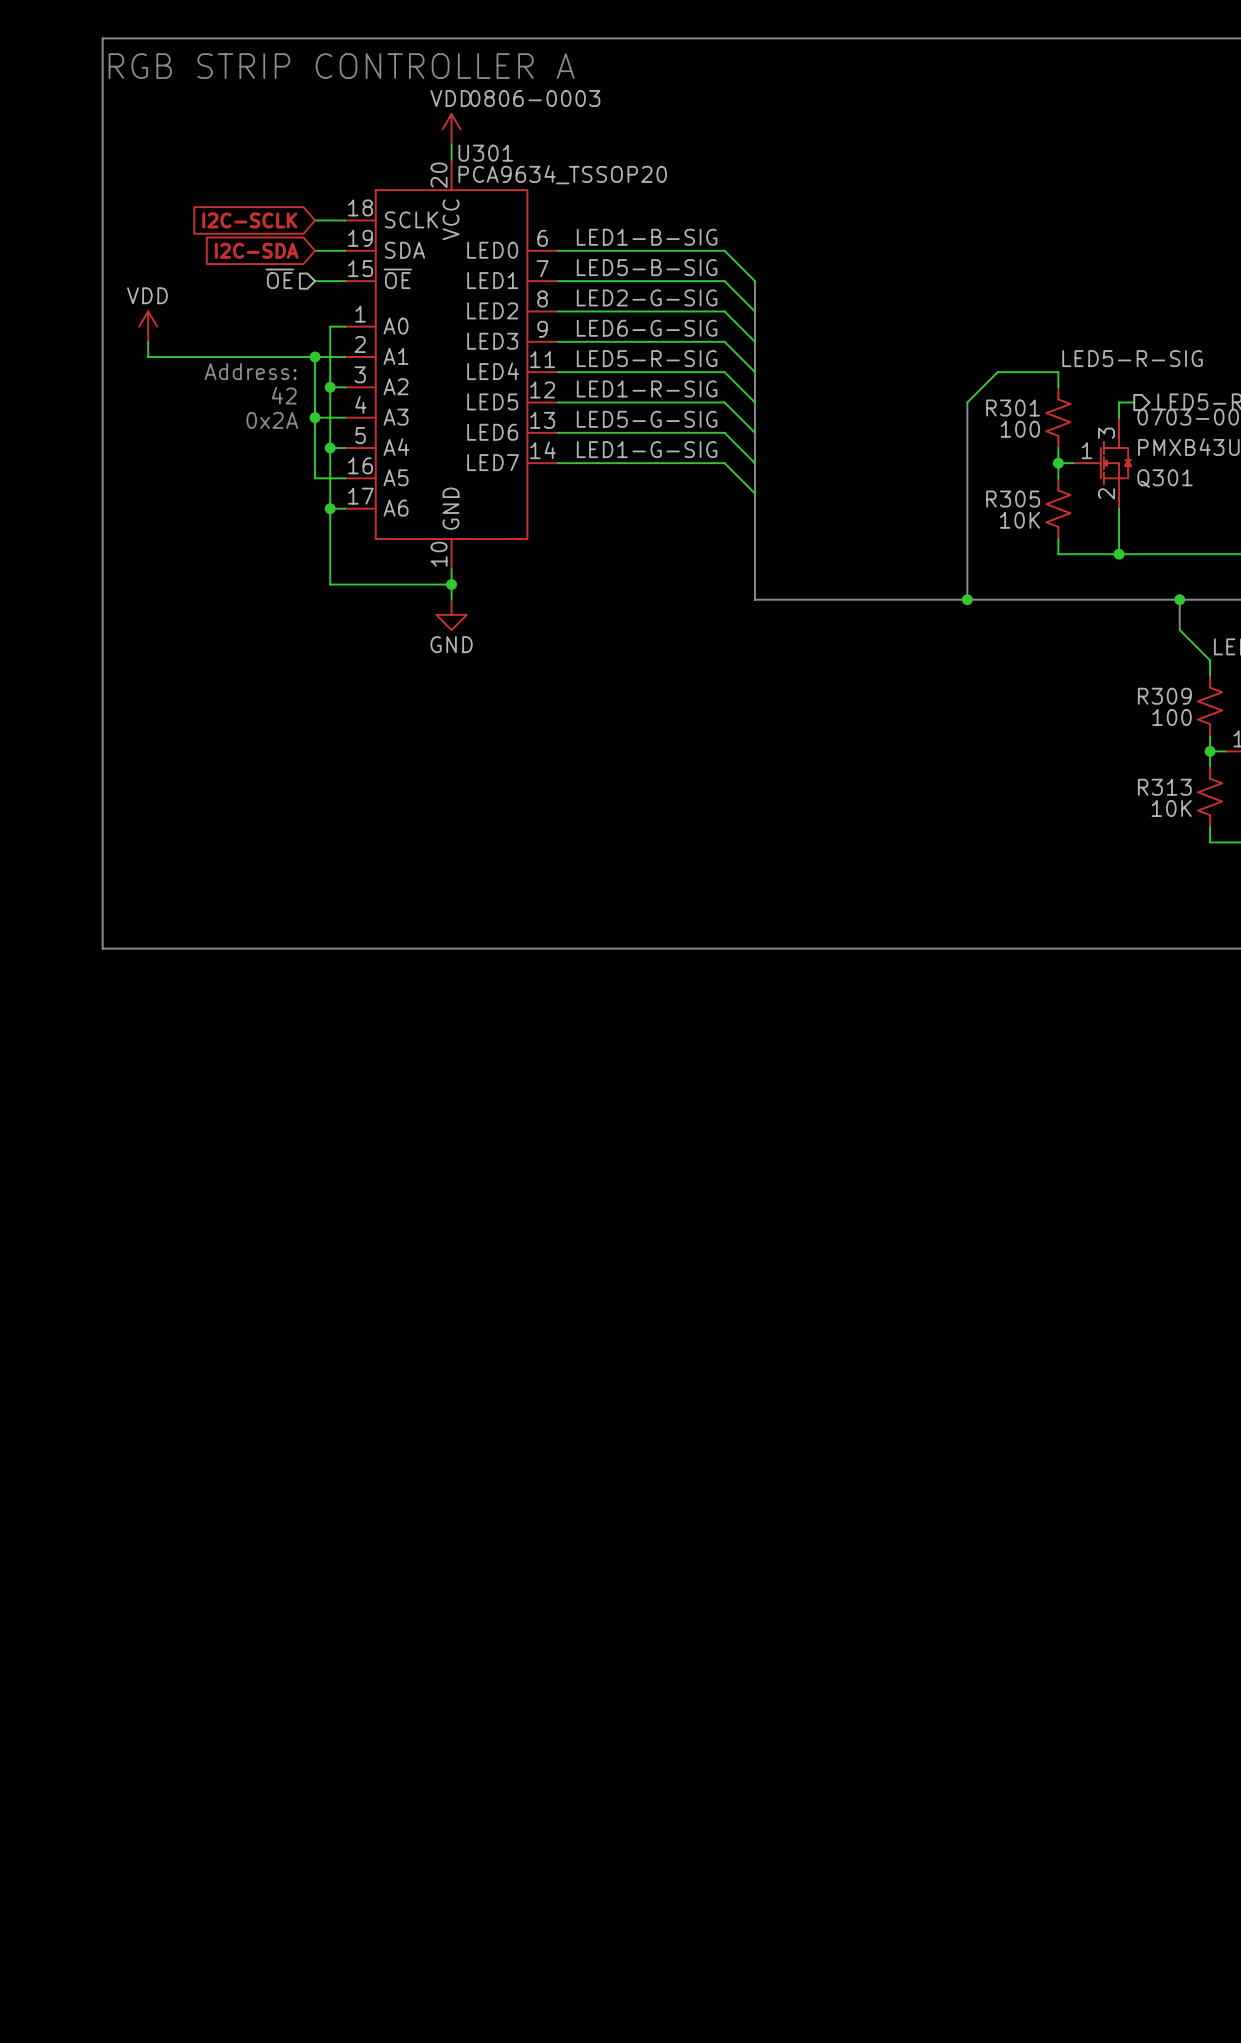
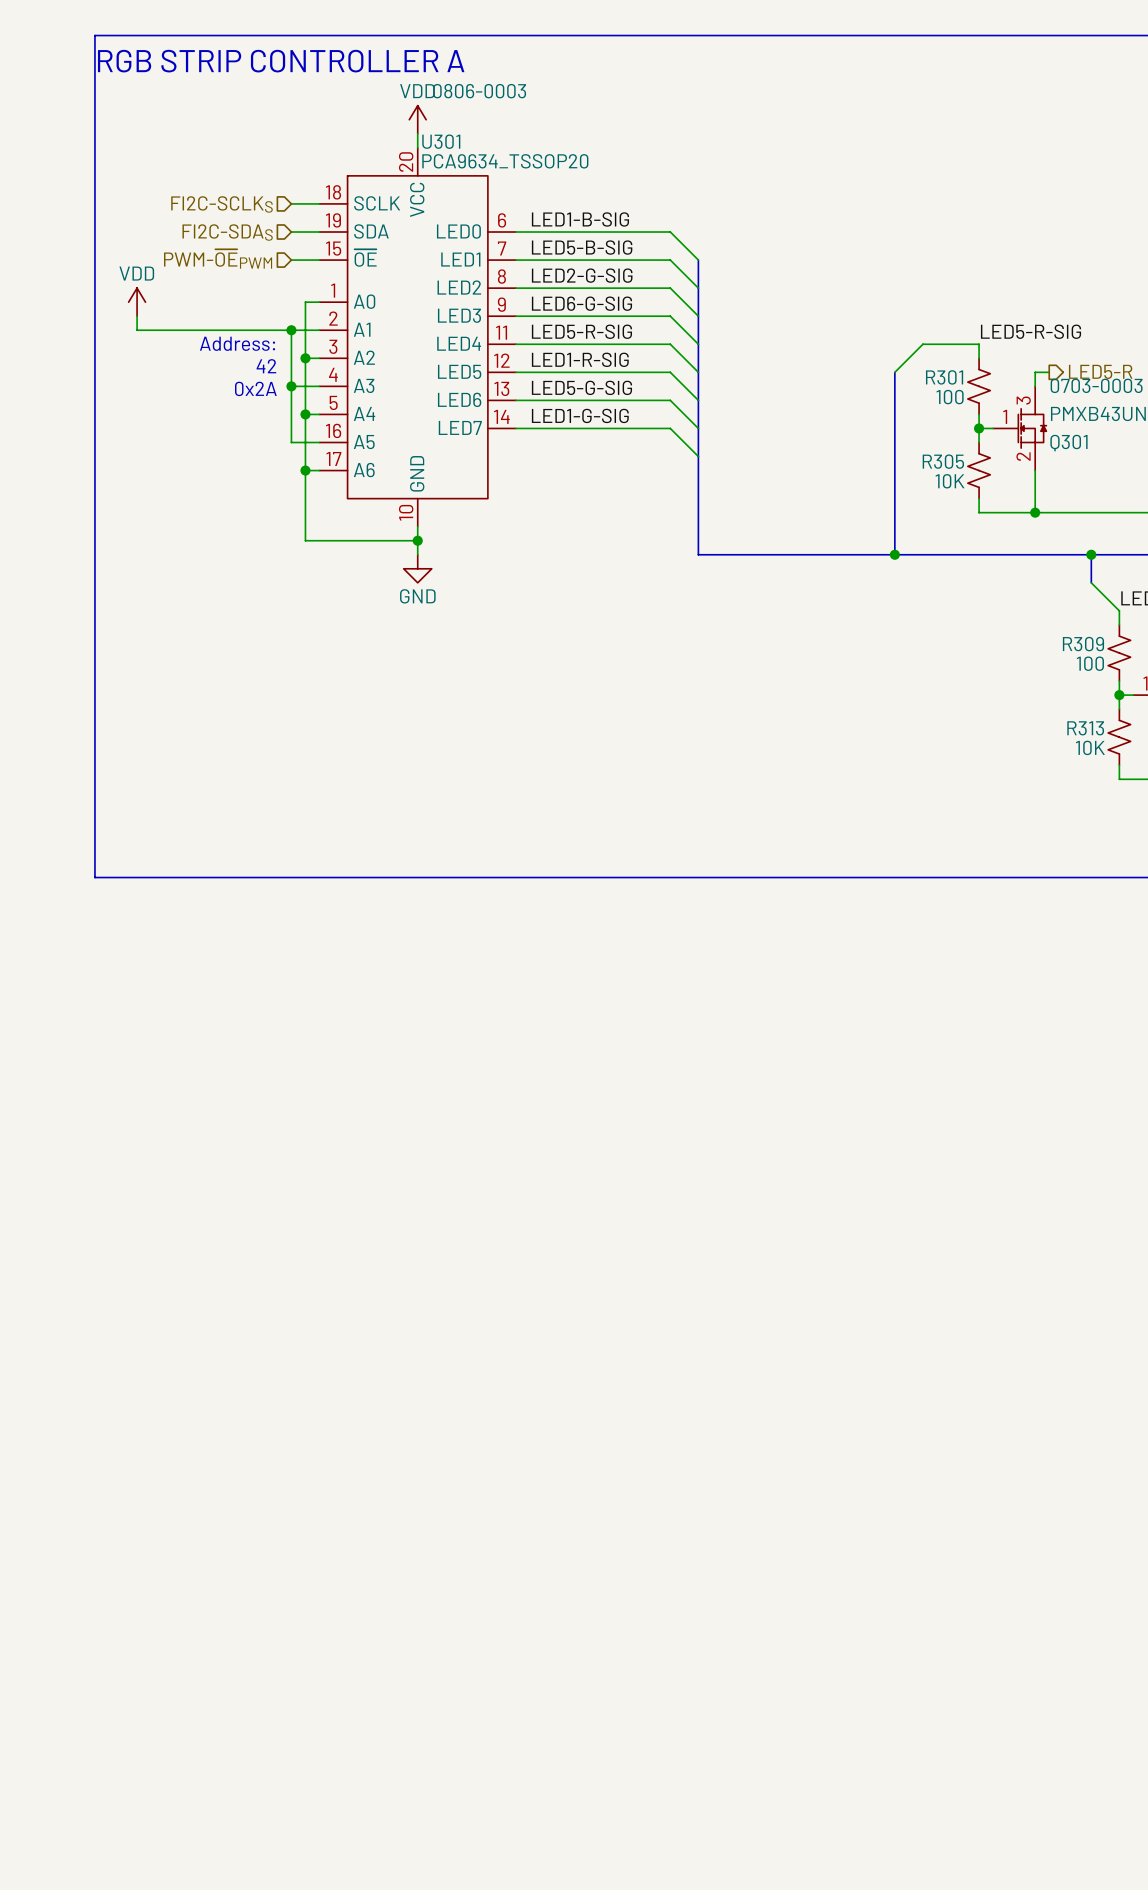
global label: I2C-SCLK (249, 220) -> none
hierarchical label: none -> FI2C-SCLKS (221, 204)
global label: I2C-SDA (256, 250) -> none
hierarchical label: none -> FI2C-SDAS (227, 232)
hierarchical label: ~{OE} (279, 278) -> PWM-~{OE}PWM (218, 258)

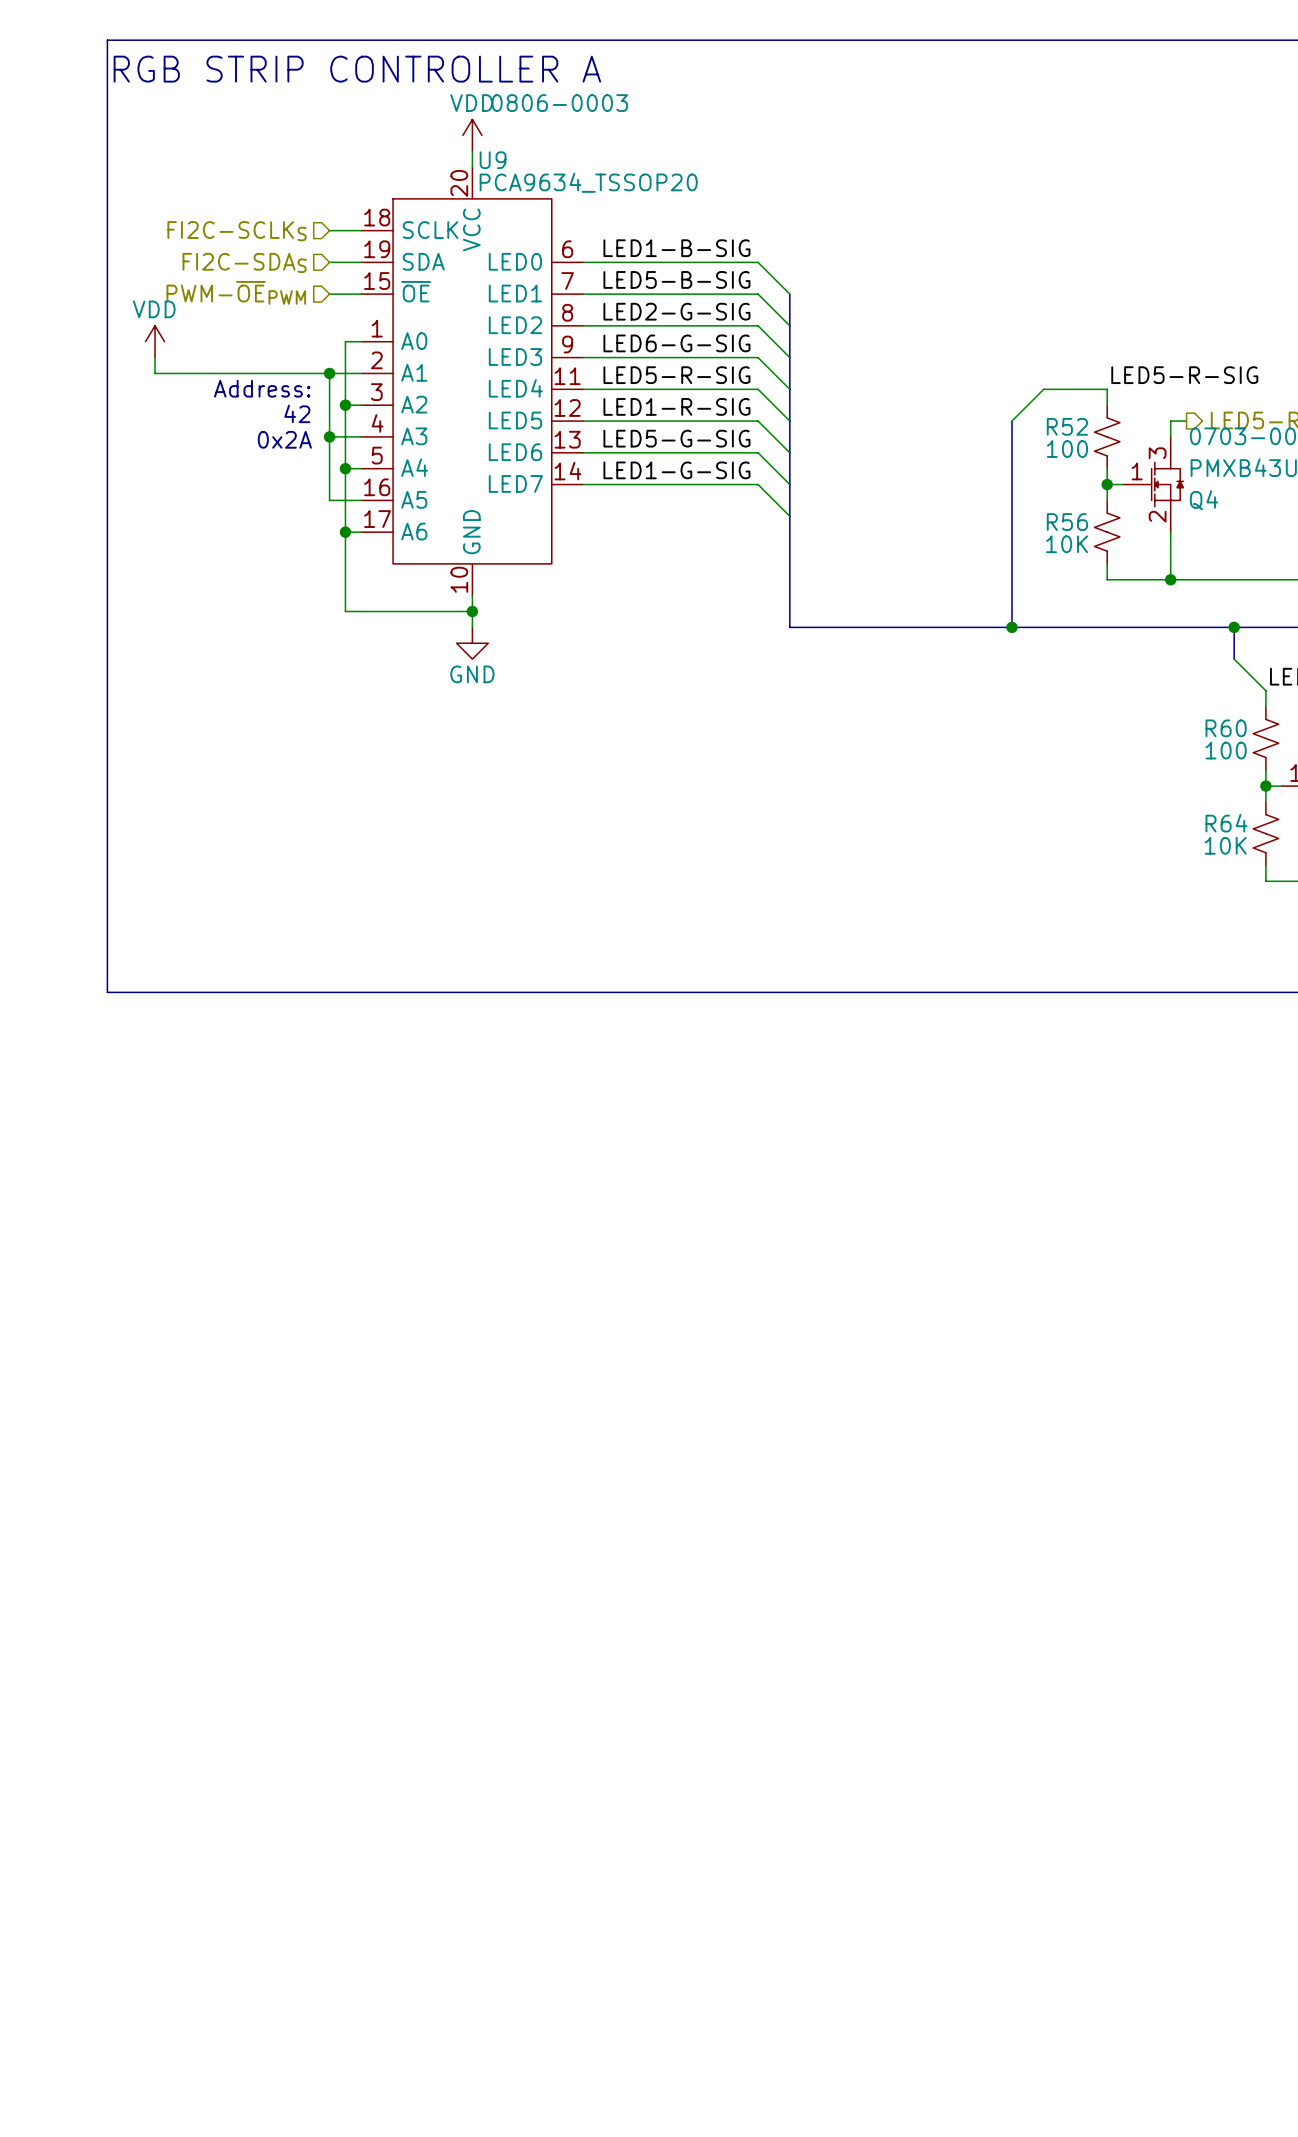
U301 name: U301 (441, 141) -> U9 (493, 160)
R301 name: R301 (944, 377) -> R52 (1067, 426)
Q301 name: Q301 (1068, 443) -> Q4 (1204, 500)
R305 name: R305 (943, 461) -> R56 (1067, 522)
R309 name: R309 (1083, 644) -> R60 (1226, 728)
R313 name: R313 (1085, 728) -> R64 (1226, 823)

